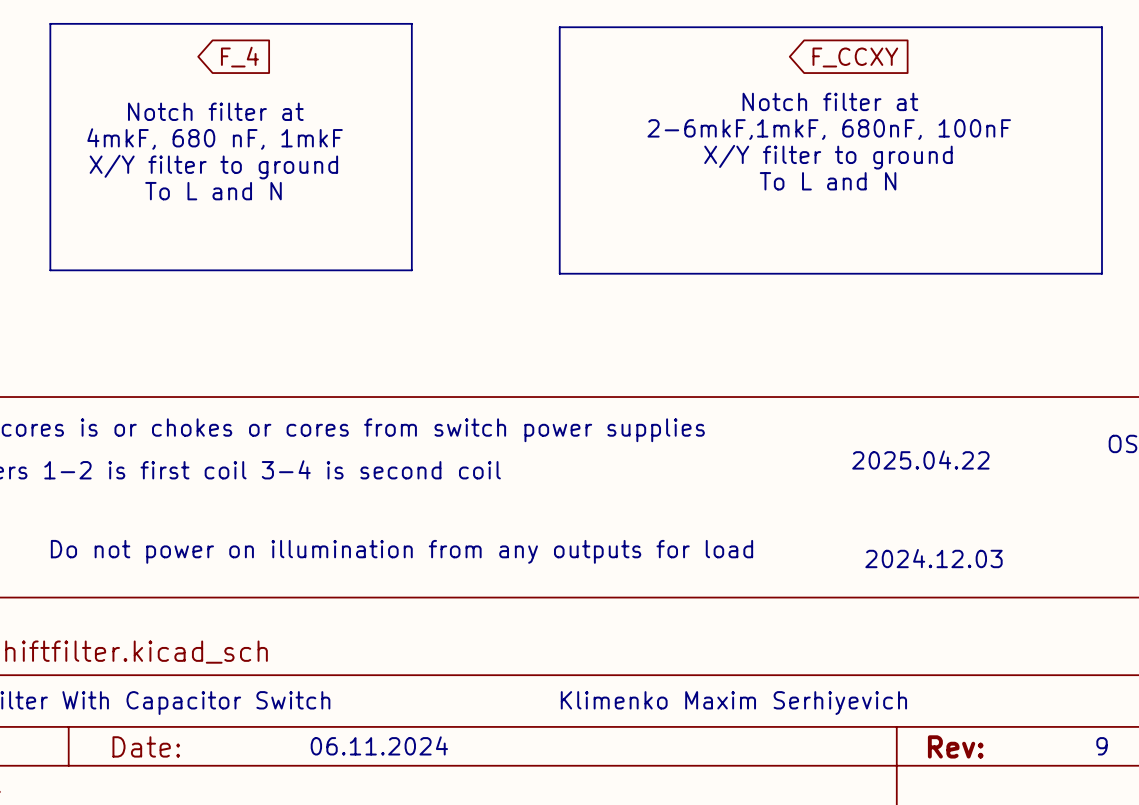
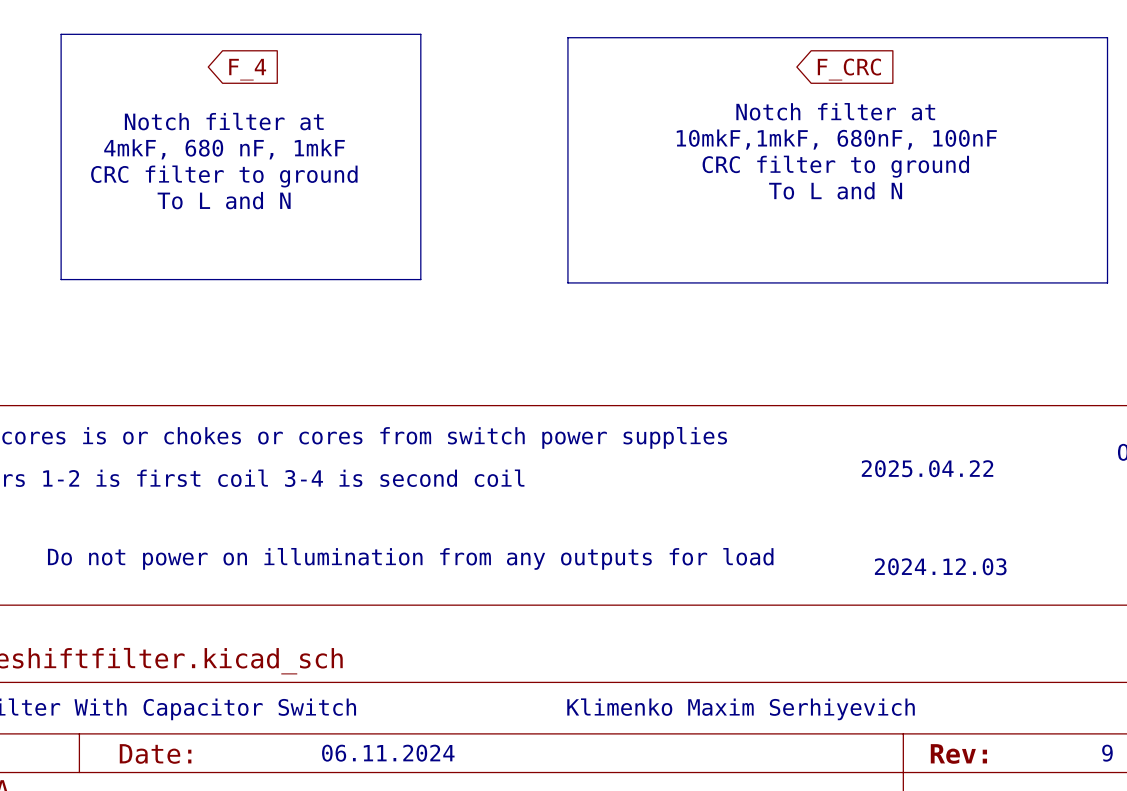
global label: F_CCXY (855, 57) -> F_CRC (849, 69)
text: 2-6mkF,1mkF, 680nF, 100nF (829, 129) -> 10mkF,1mkF, 680nF, 100nF (836, 139)
text: X/Y filter to ground (828, 157) -> CRC filter to ground (835, 166)
text: X/Y filter to ground (213, 167) -> CRC filter to ground (224, 176)

